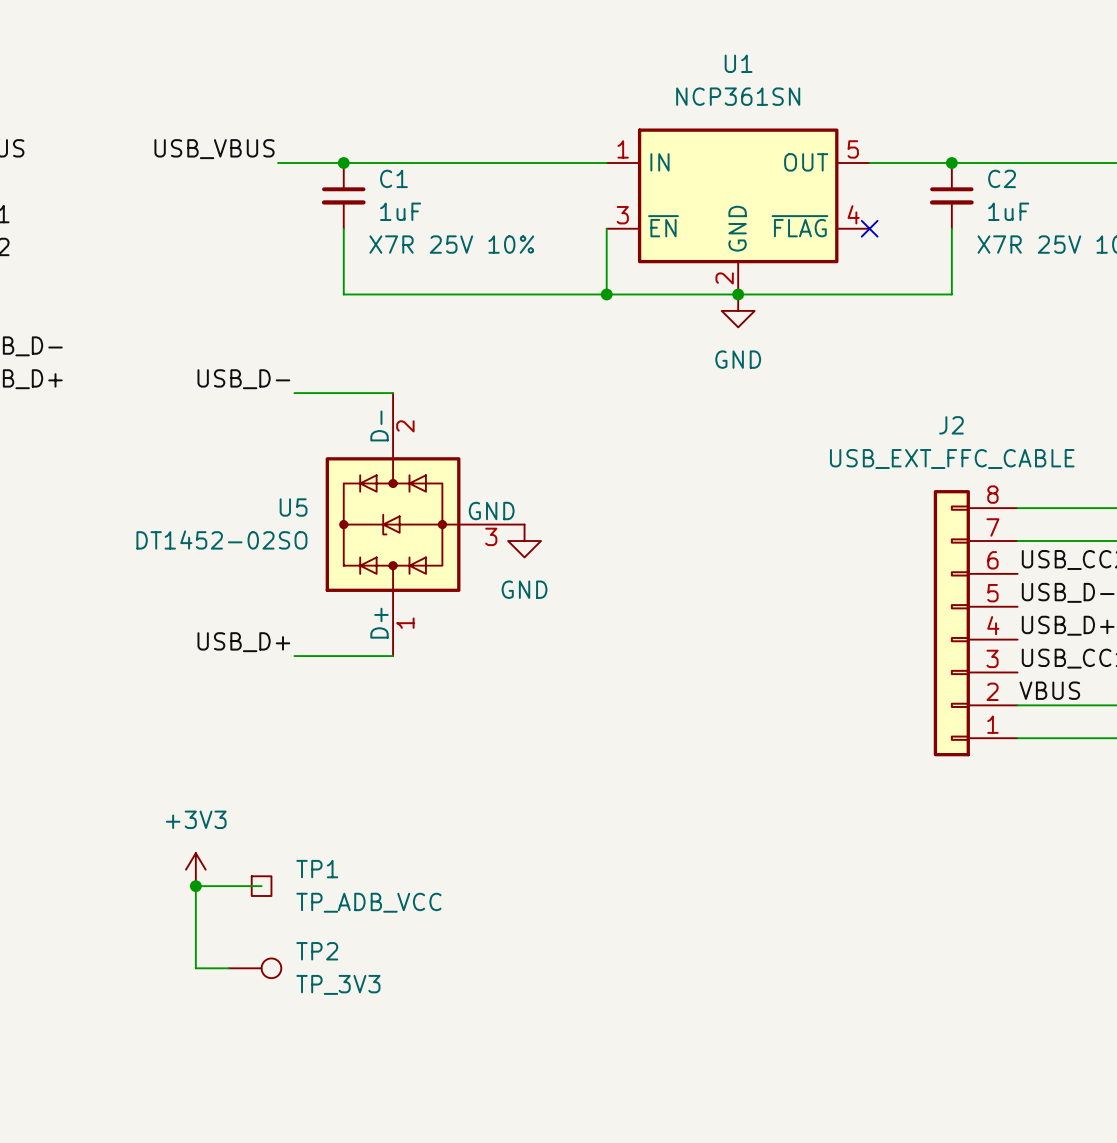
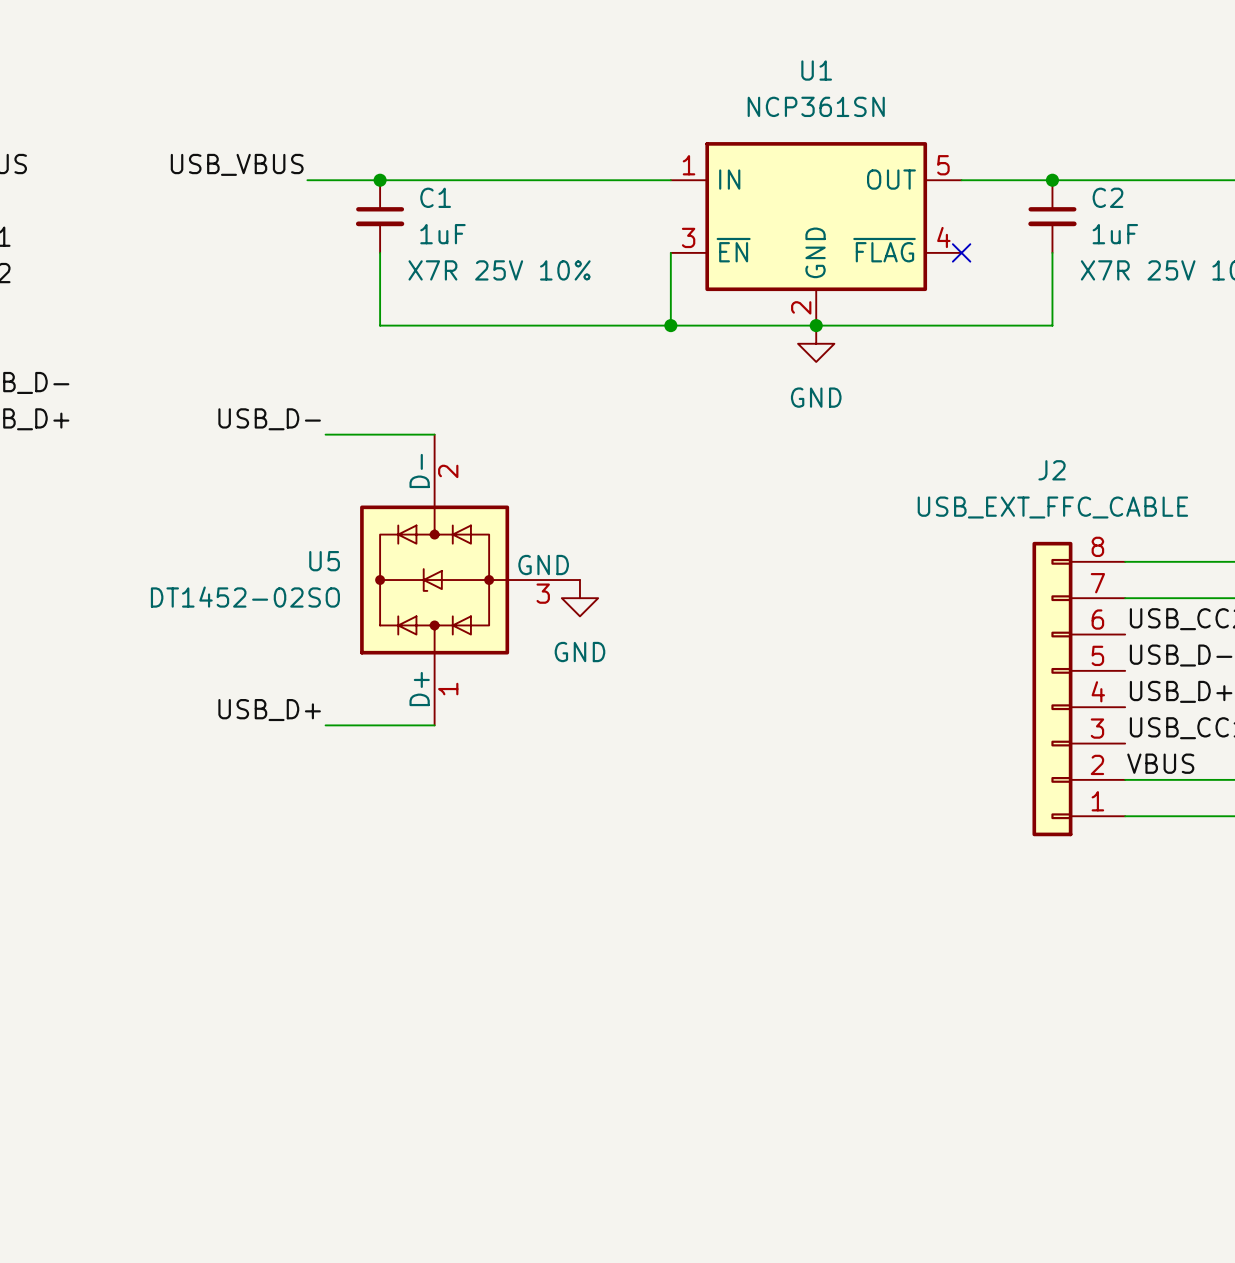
power symbol: +3V3 (195, 869) -> none
junction: (195, 886) -> none
wire: (261, 886) (195, 886) (195, 968) (228, 968) -> none
TP1: TP_ADB_VCC (261, 886) -> none
TP2: TP_3V3 (255, 968) -> none

